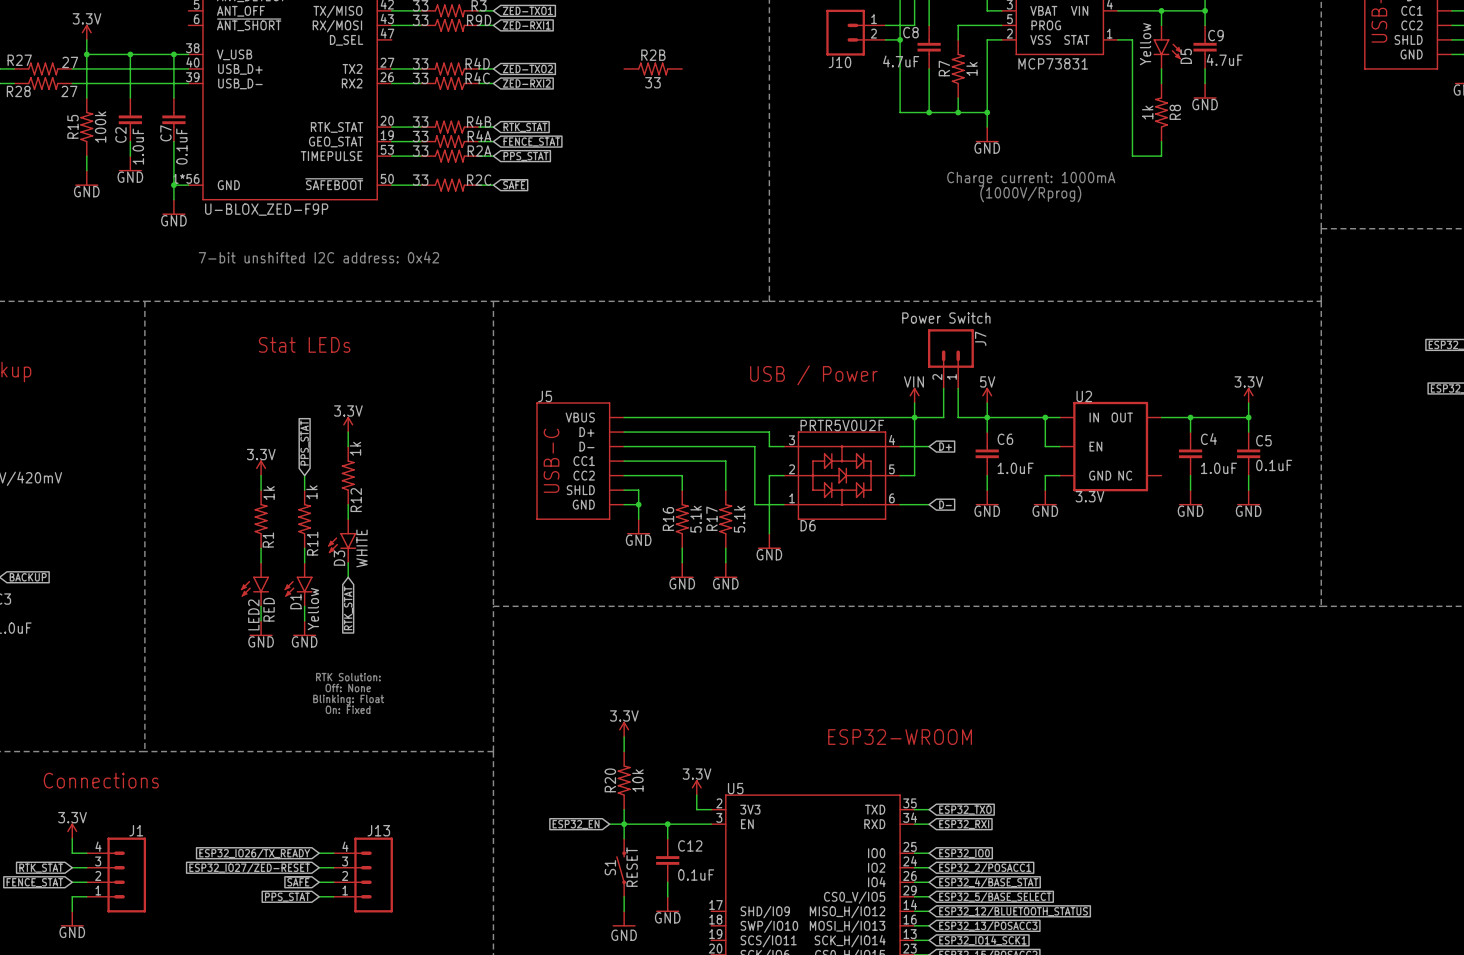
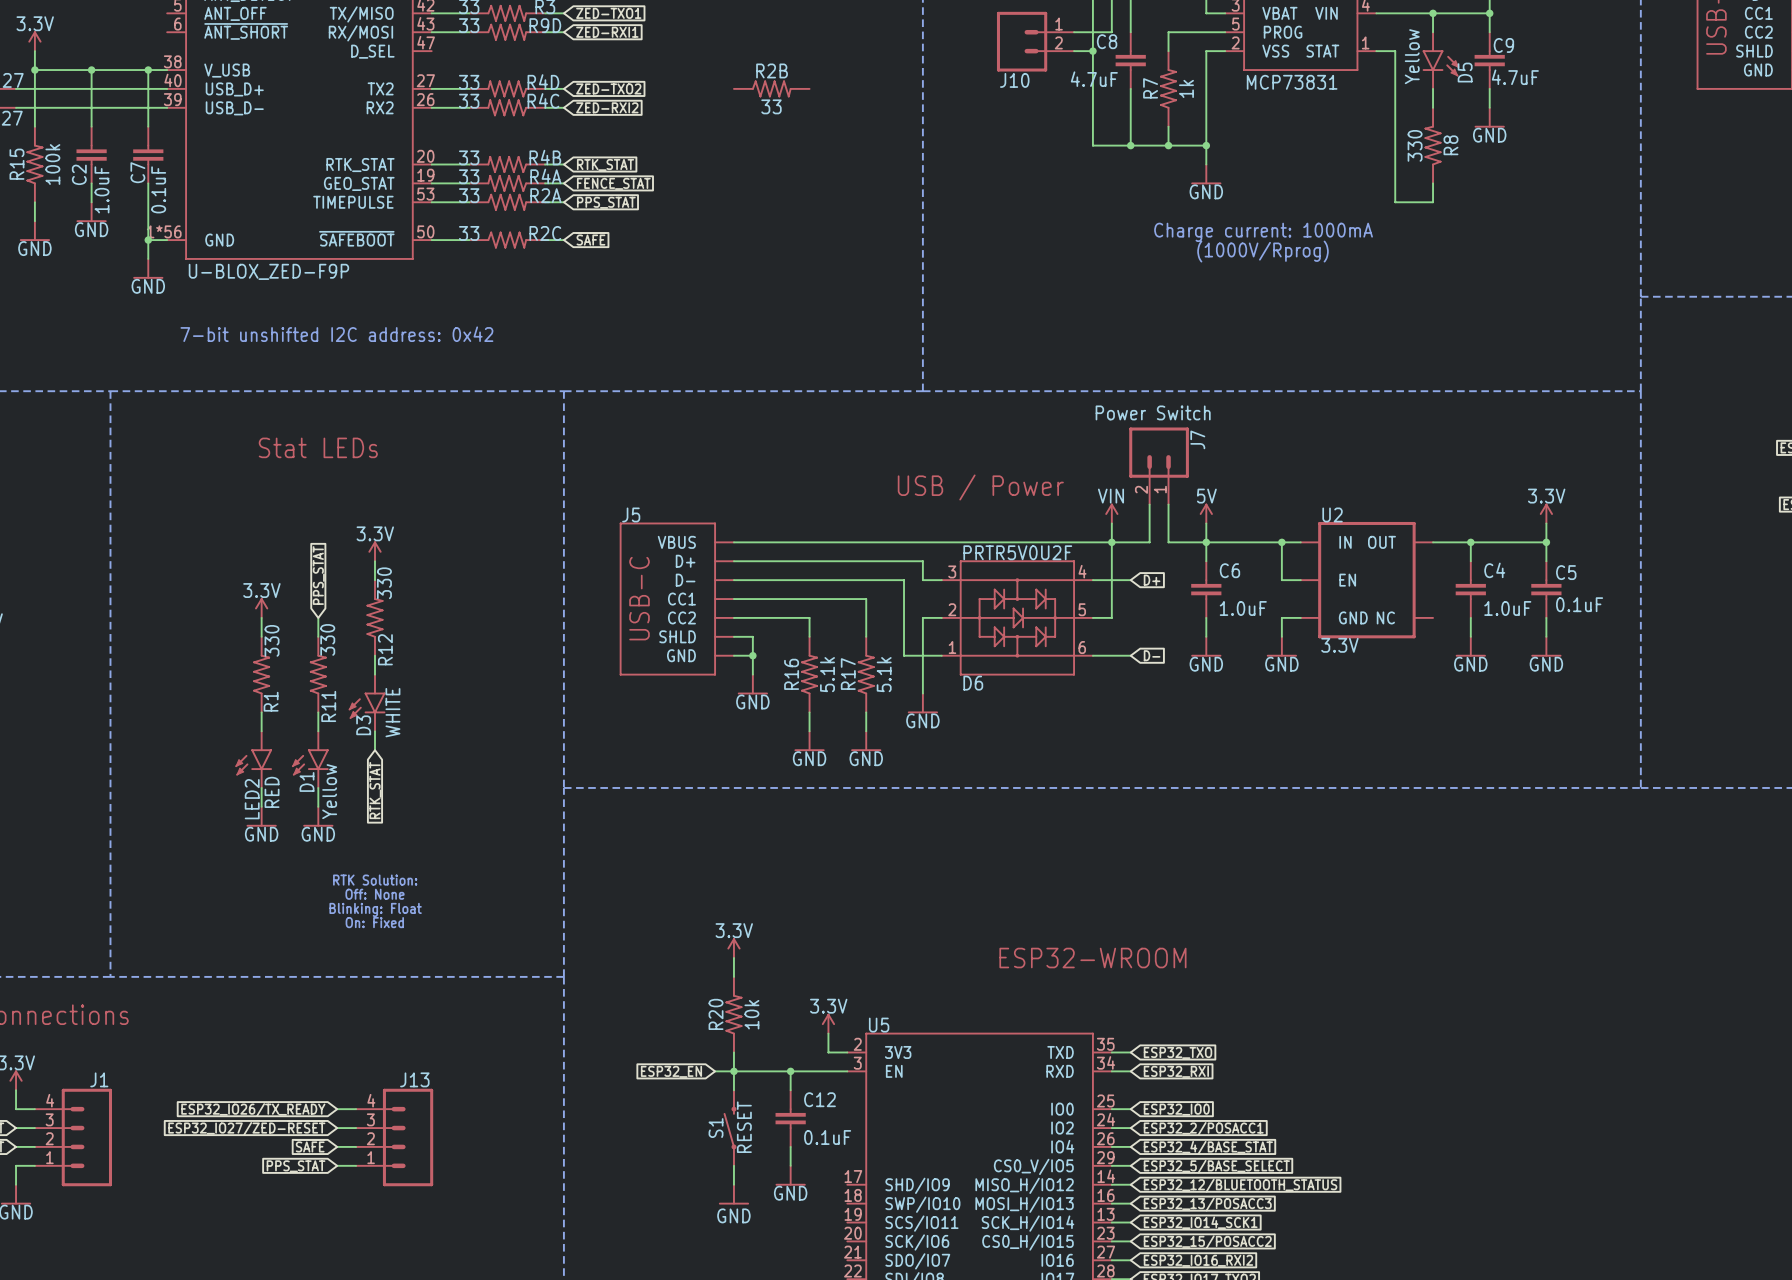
R8 value: 1k (1147, 112) -> 330 (1415, 145)
R12 value: 1k (355, 448) -> 330 (384, 583)
R11 value: 1k (311, 492) -> 330 (327, 639)
R1 value: 1k (269, 493) -> 330 (272, 640)

